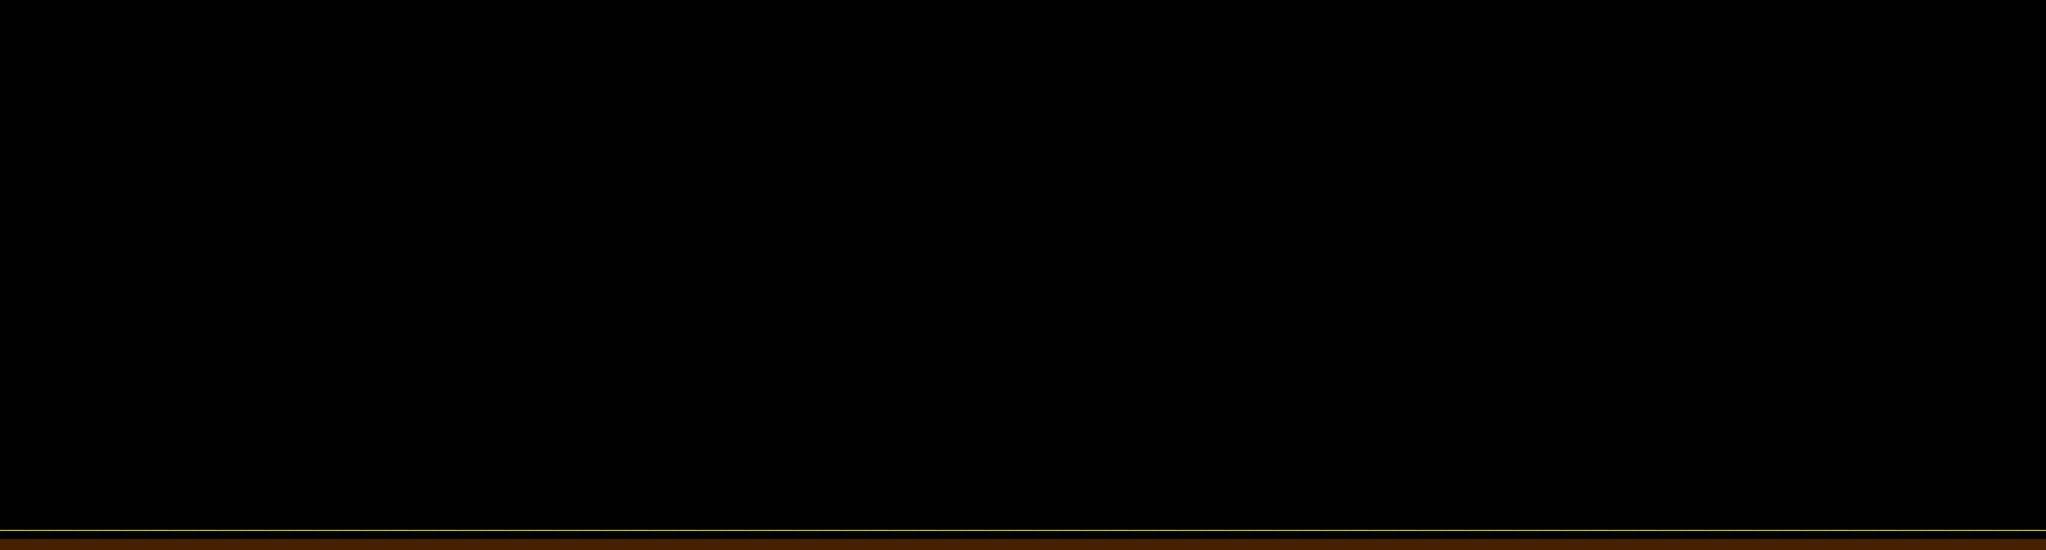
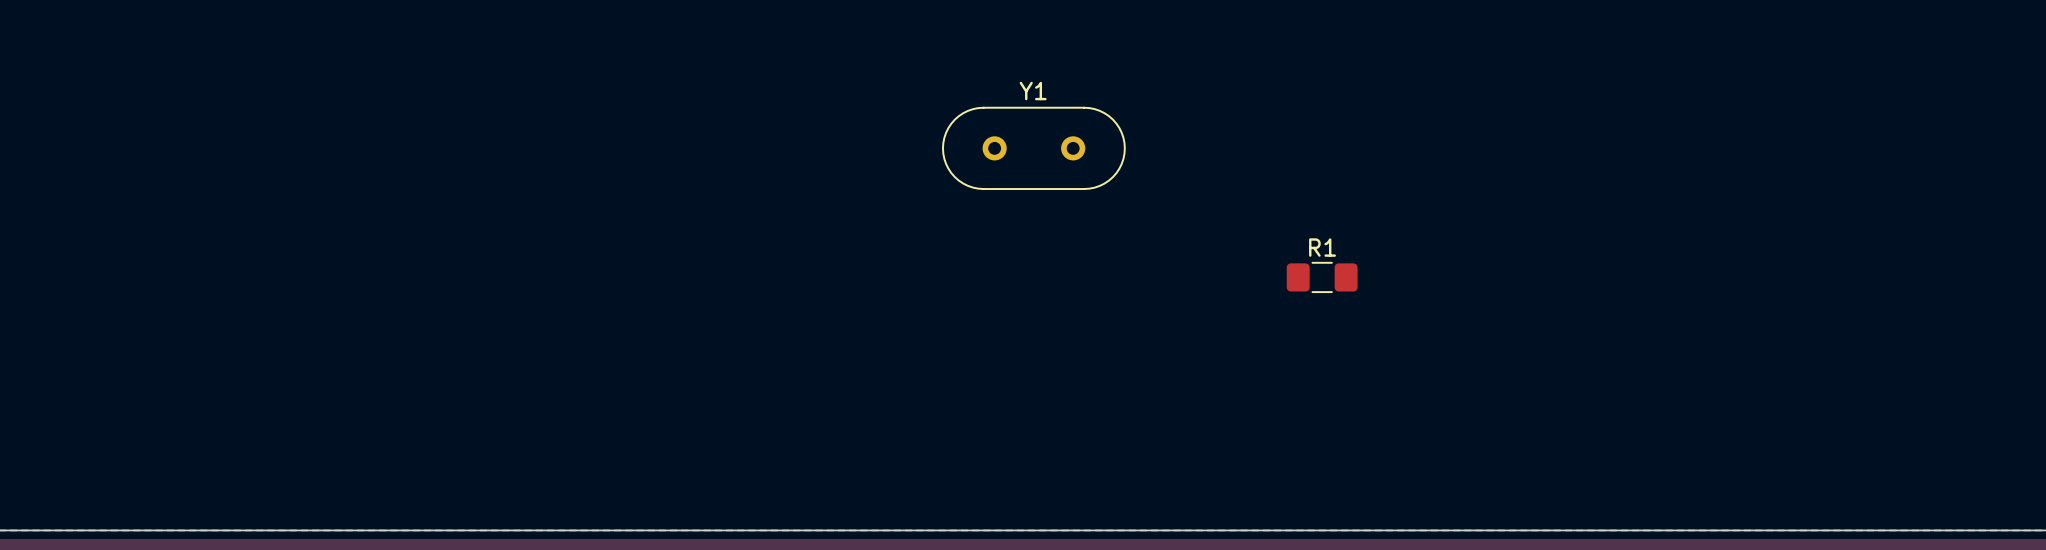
Y1: none -> (1033, 148)
R1: none -> (1322, 277)

